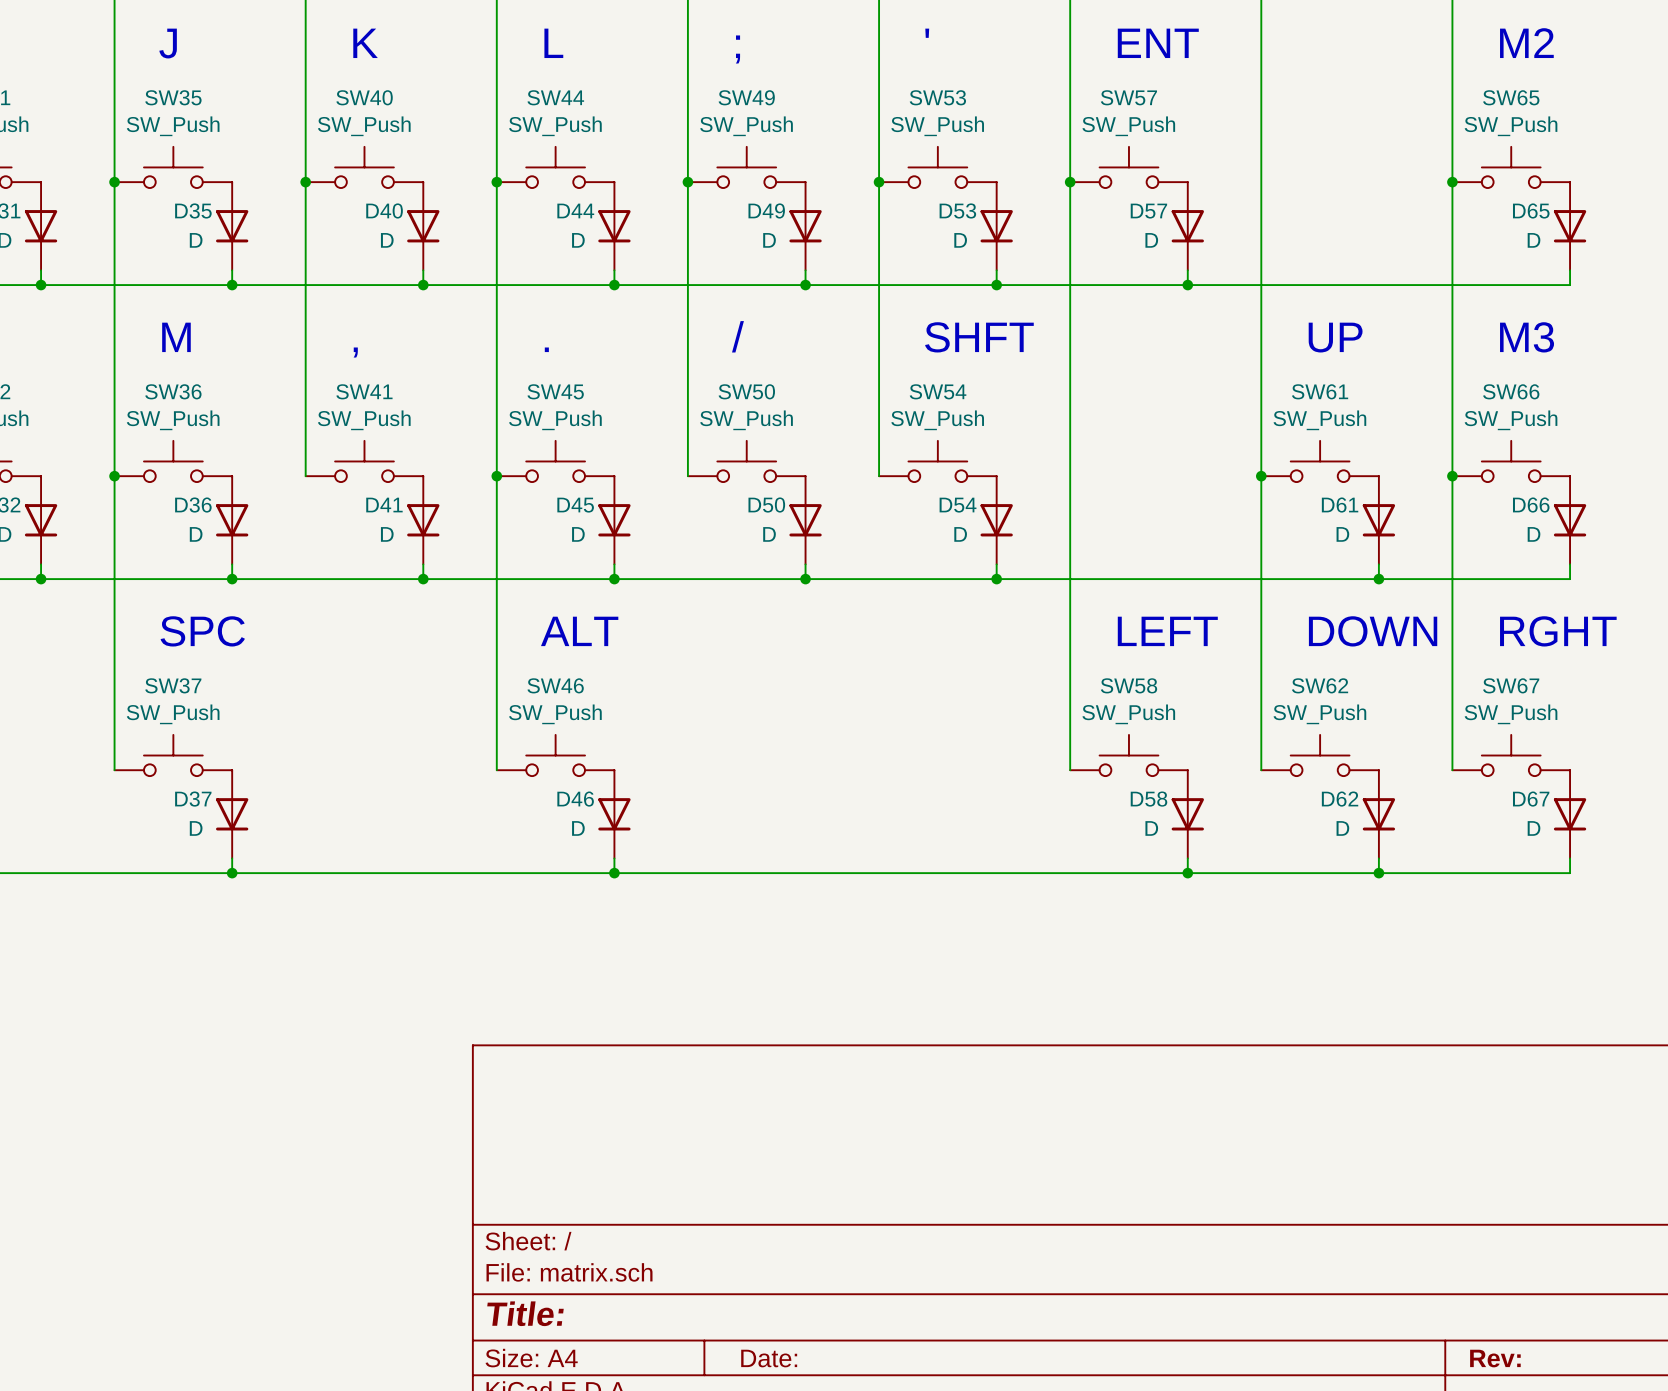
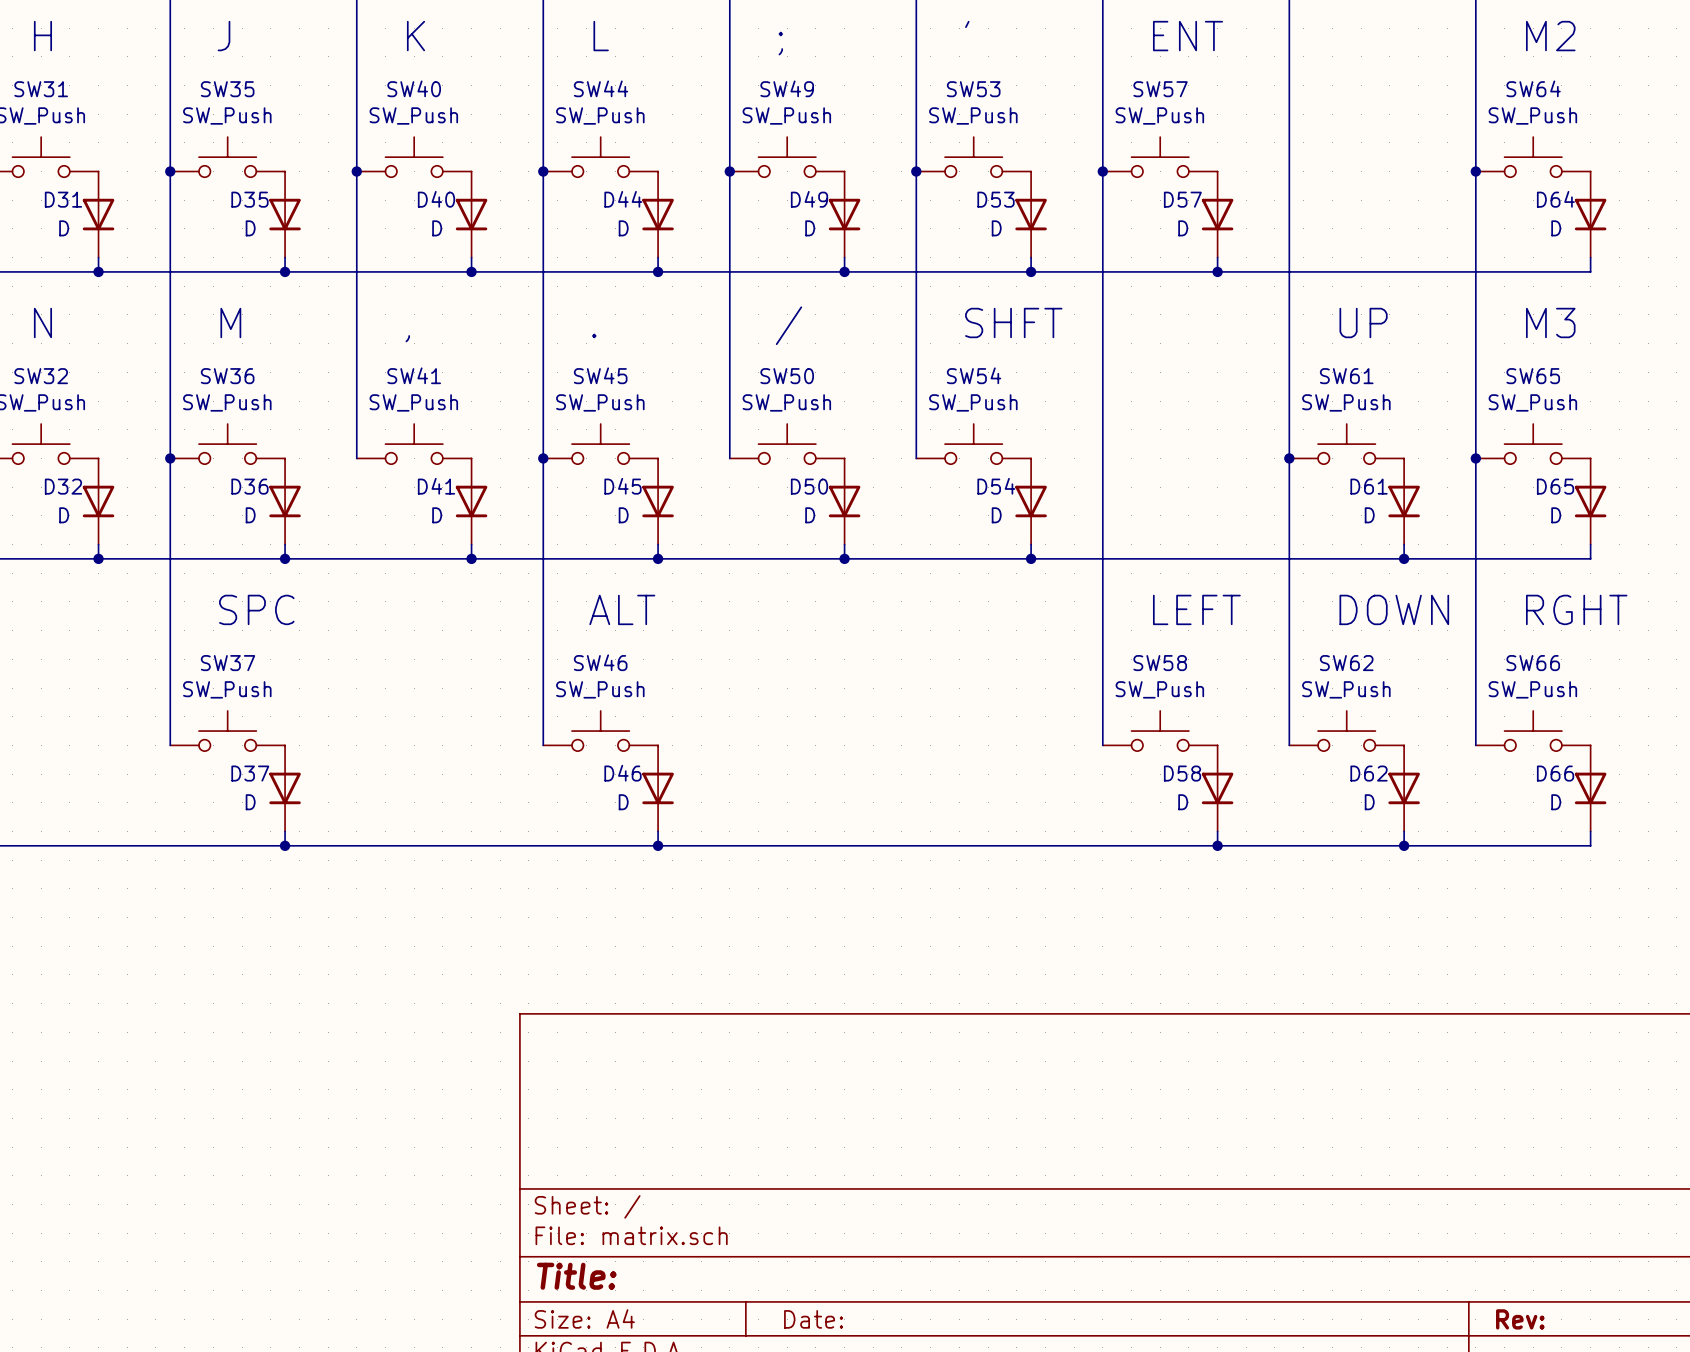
SW65 name: SW65 (1511, 97) -> SW64 (1533, 88)
D65 name: D65 (1531, 210) -> D64 (1555, 199)
SW66 name: SW66 (1511, 391) -> SW65 (1533, 376)
D66 name: D66 (1531, 505) -> D65 (1555, 486)
SW67 name: SW67 (1511, 685) -> SW66 (1533, 663)
D67 name: D67 (1531, 799) -> D66 (1555, 773)

